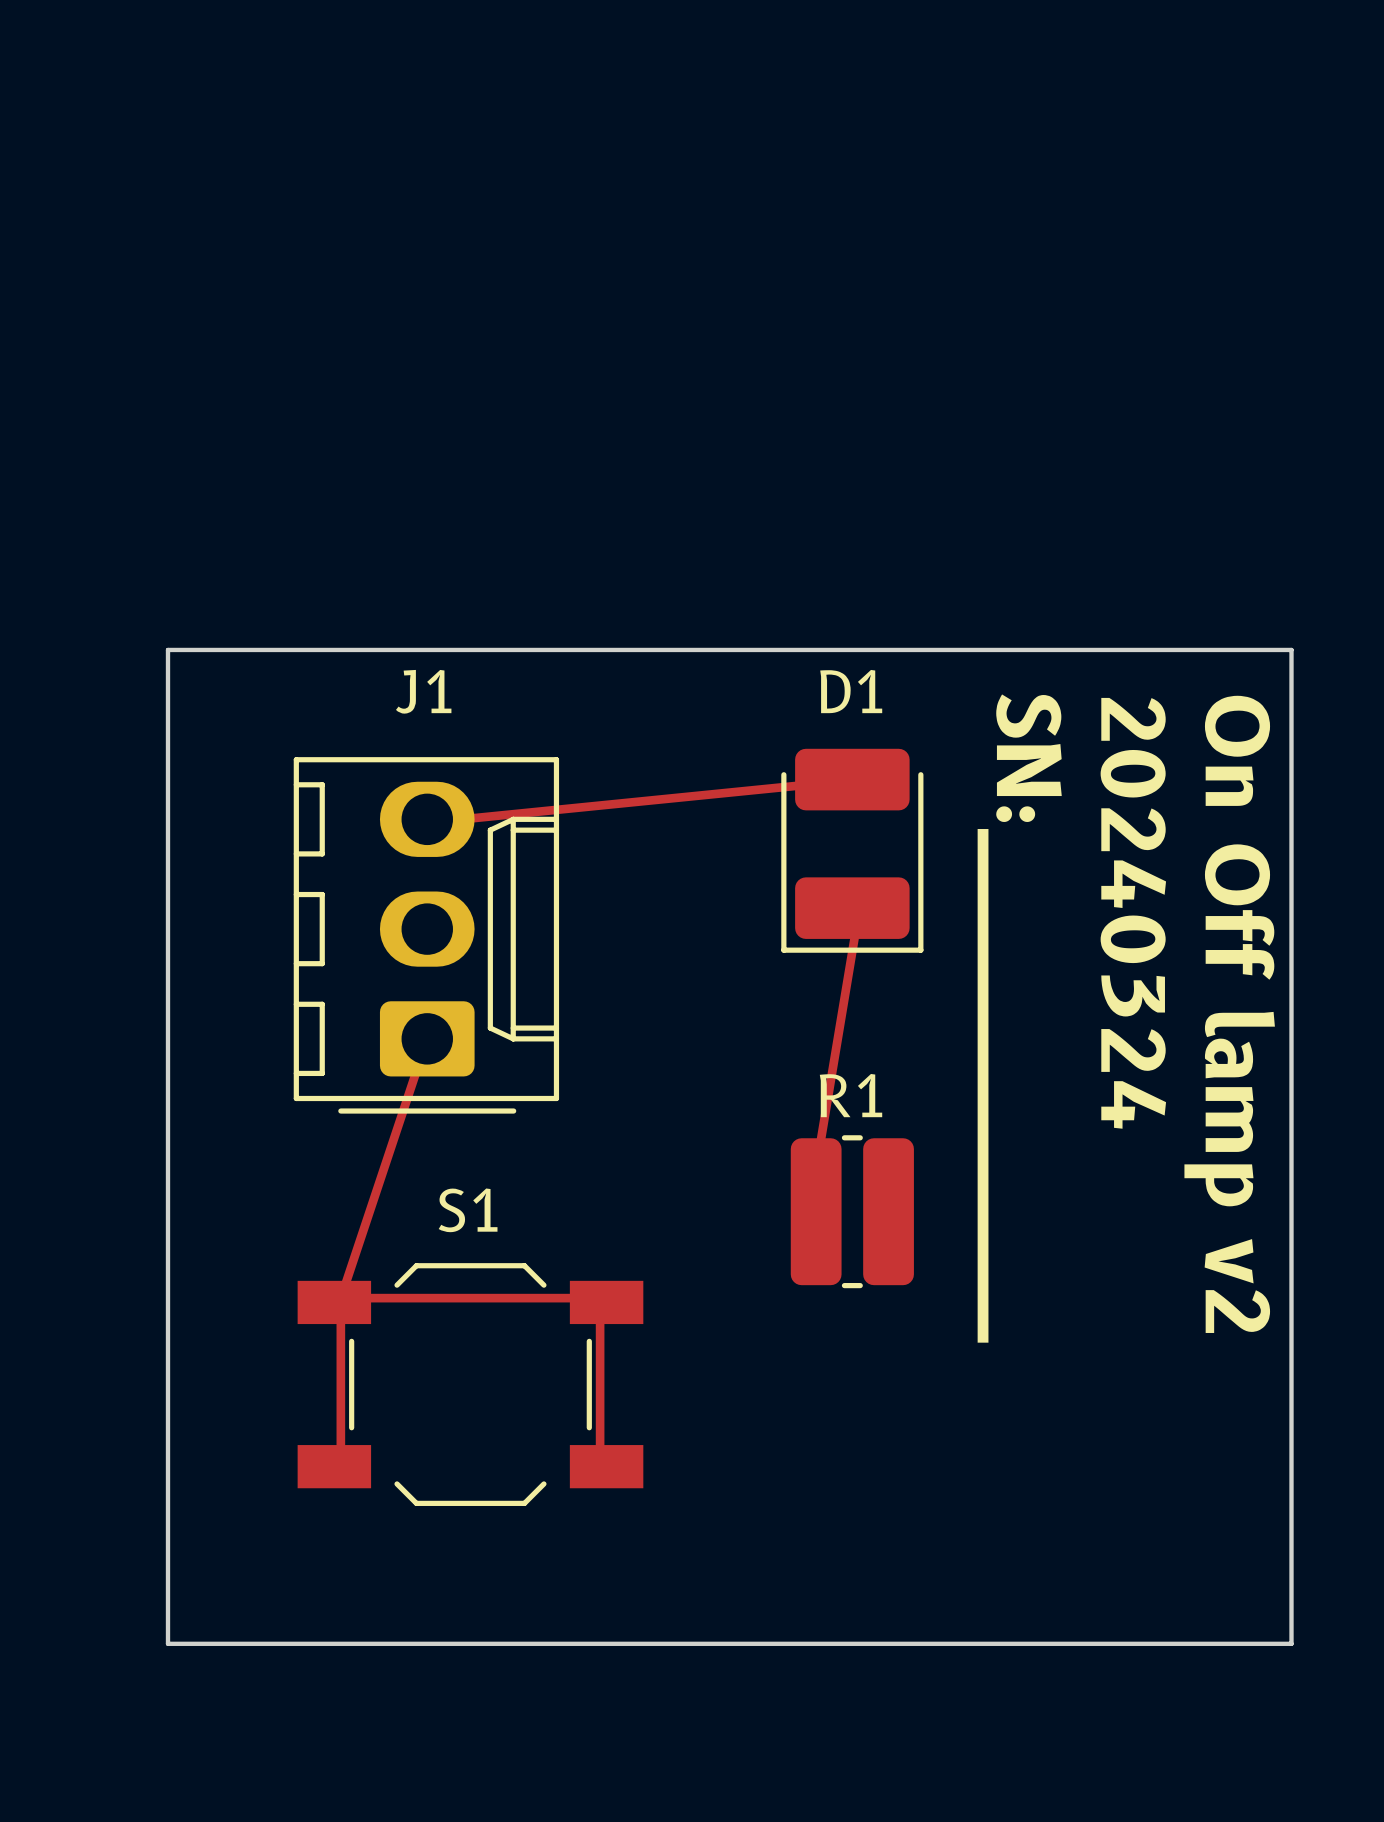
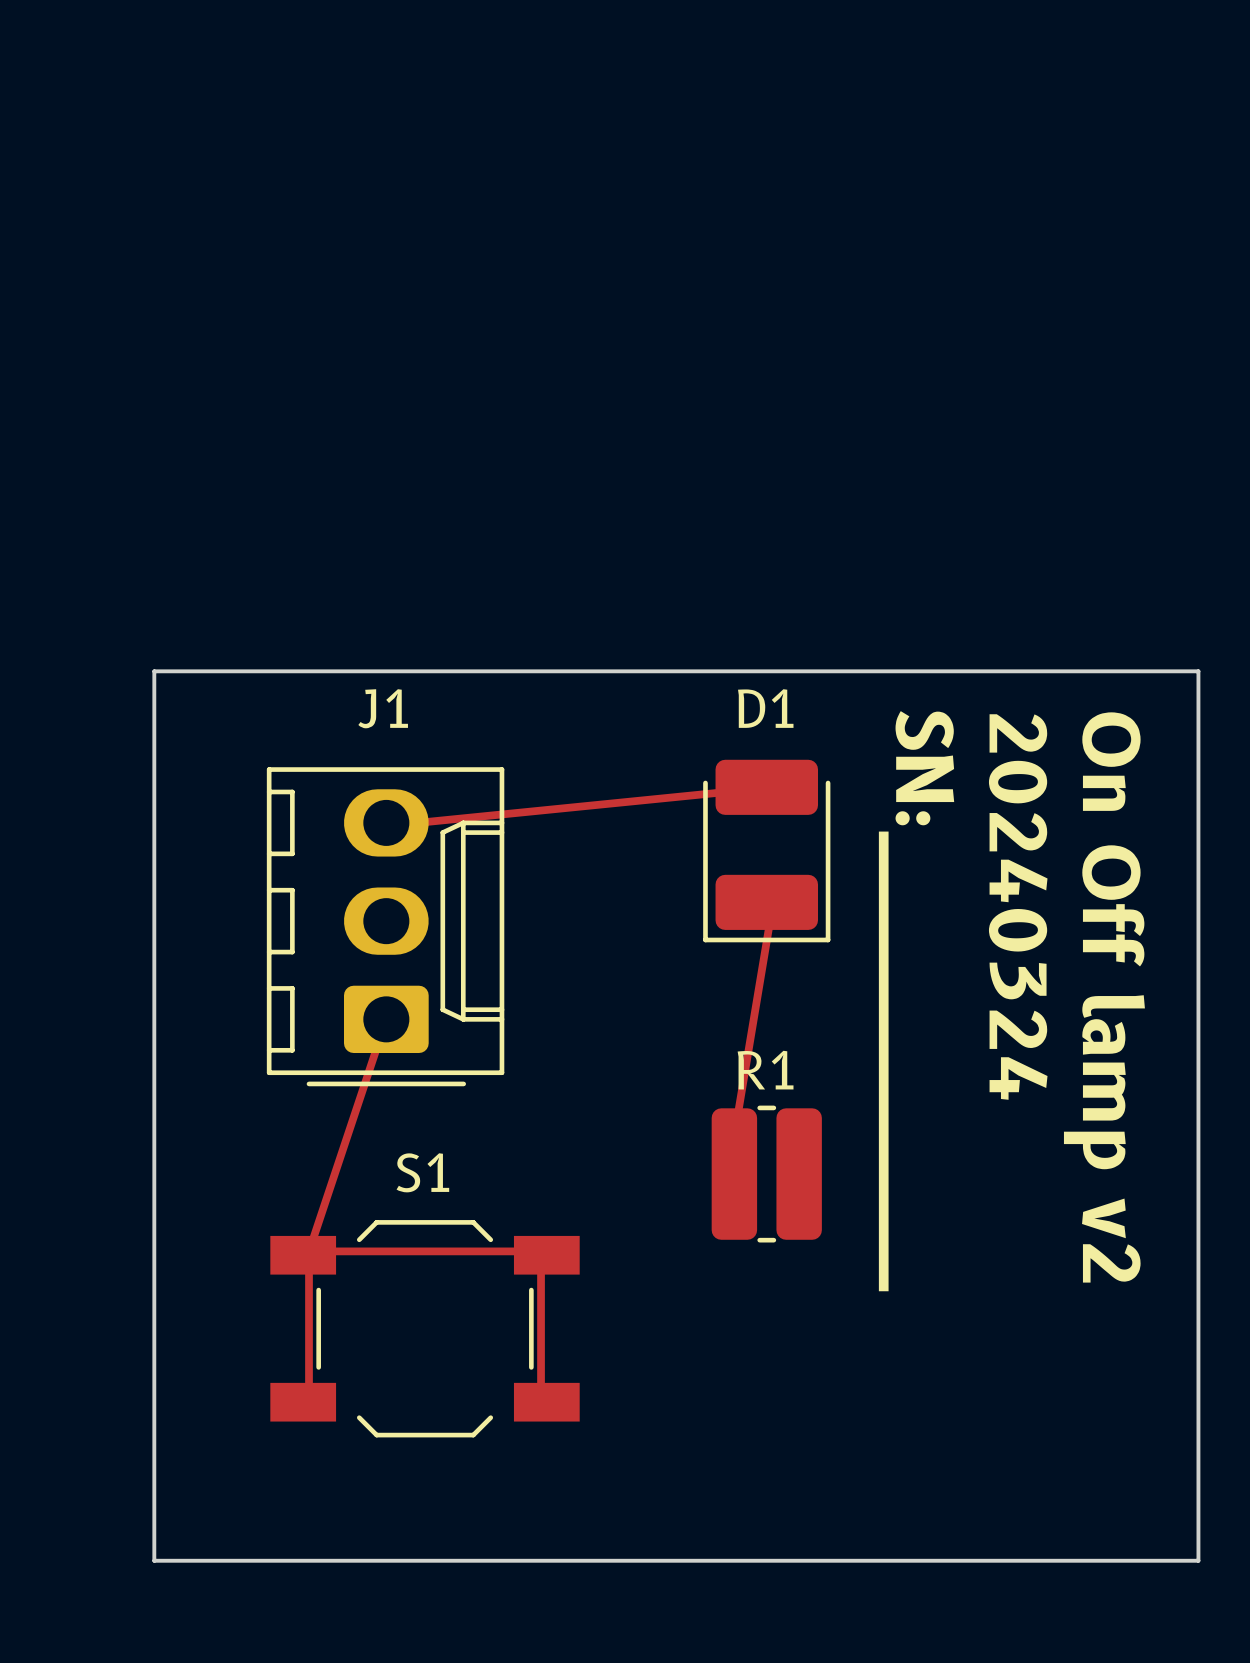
board edge: (1291, 649) (1291, 1643) -> (1159, 671) (1198, 671) (1198, 1560) (1159, 1560)

